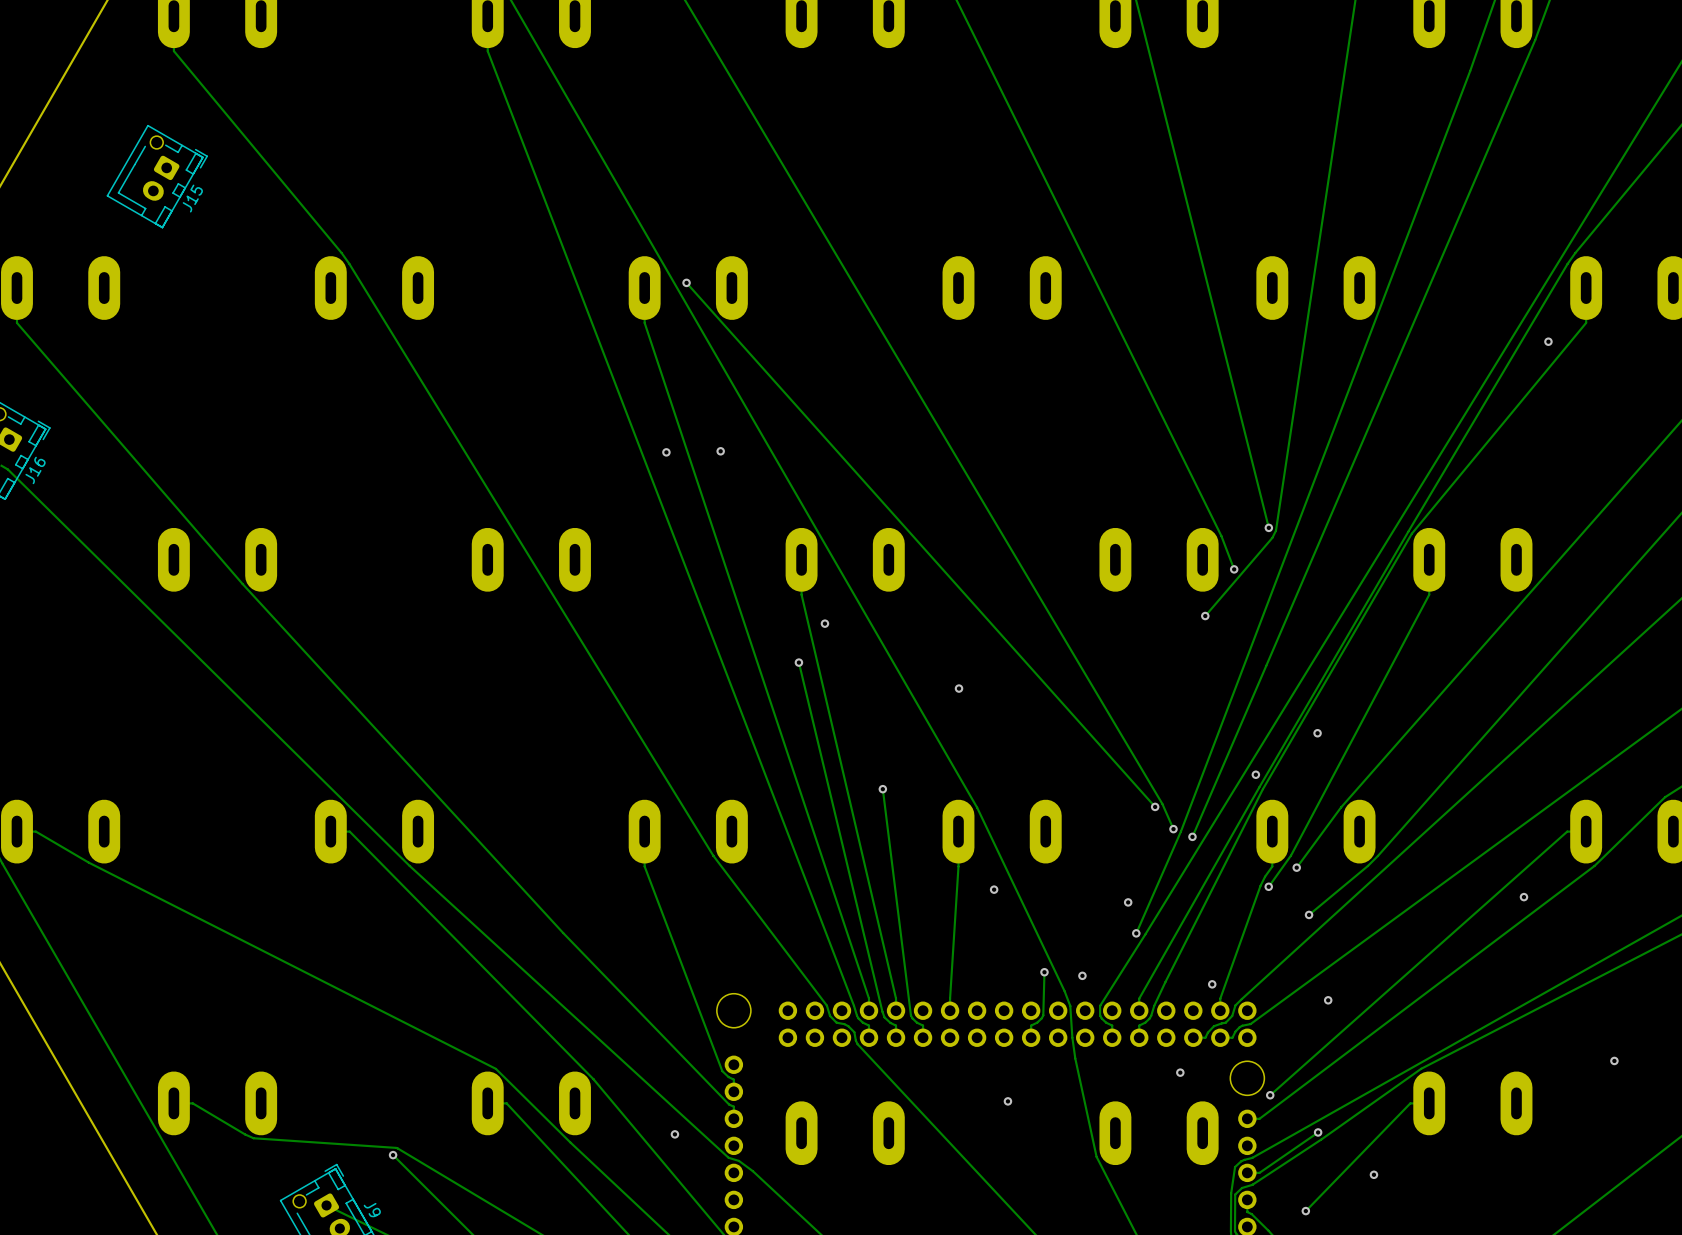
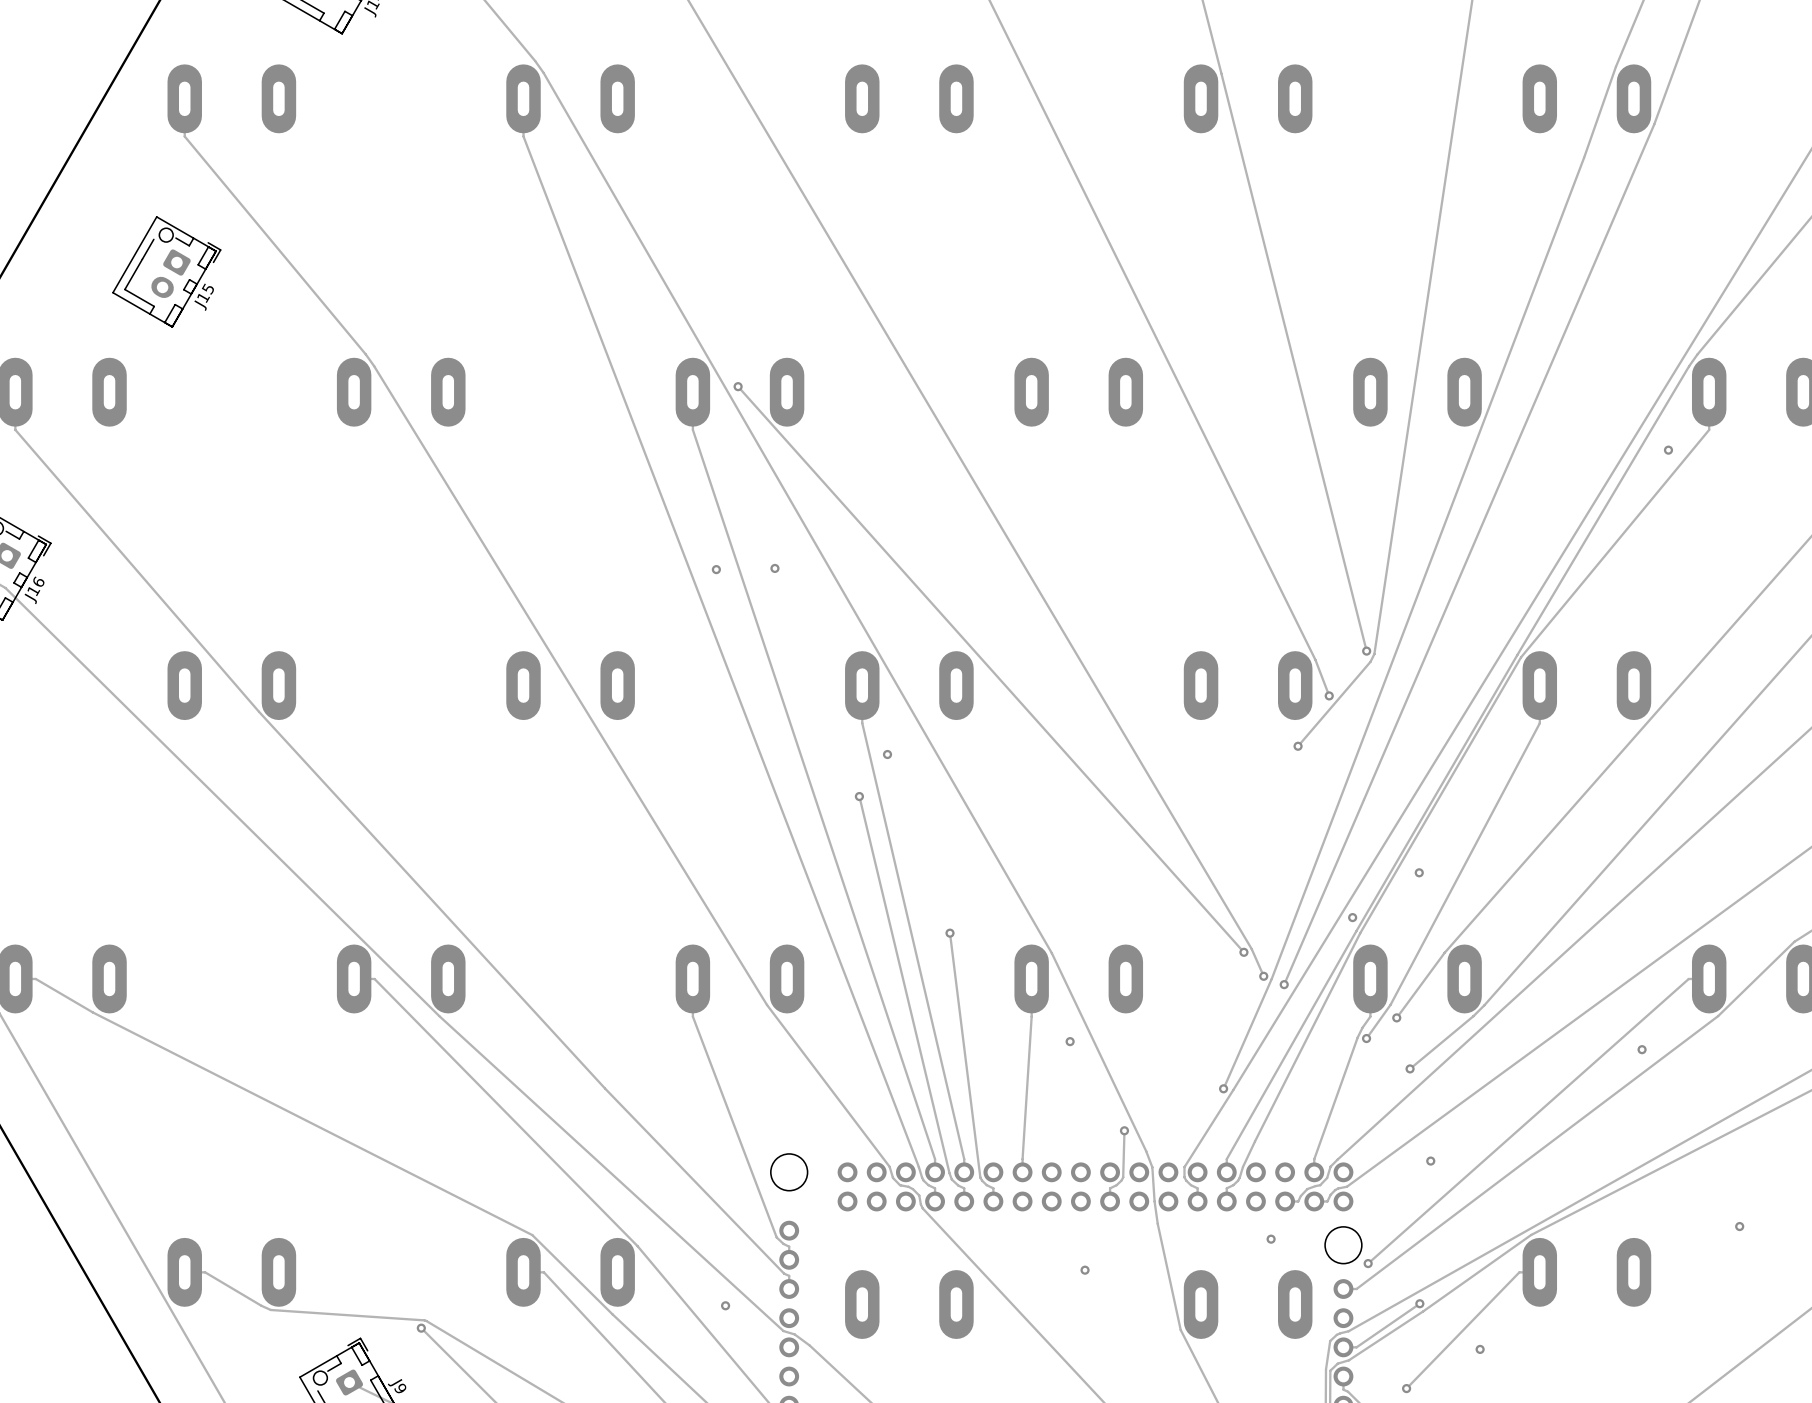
via: (959, 688) -> none
via: (1128, 902) -> none
via: (1082, 975) -> none
via: (1212, 984) -> none

